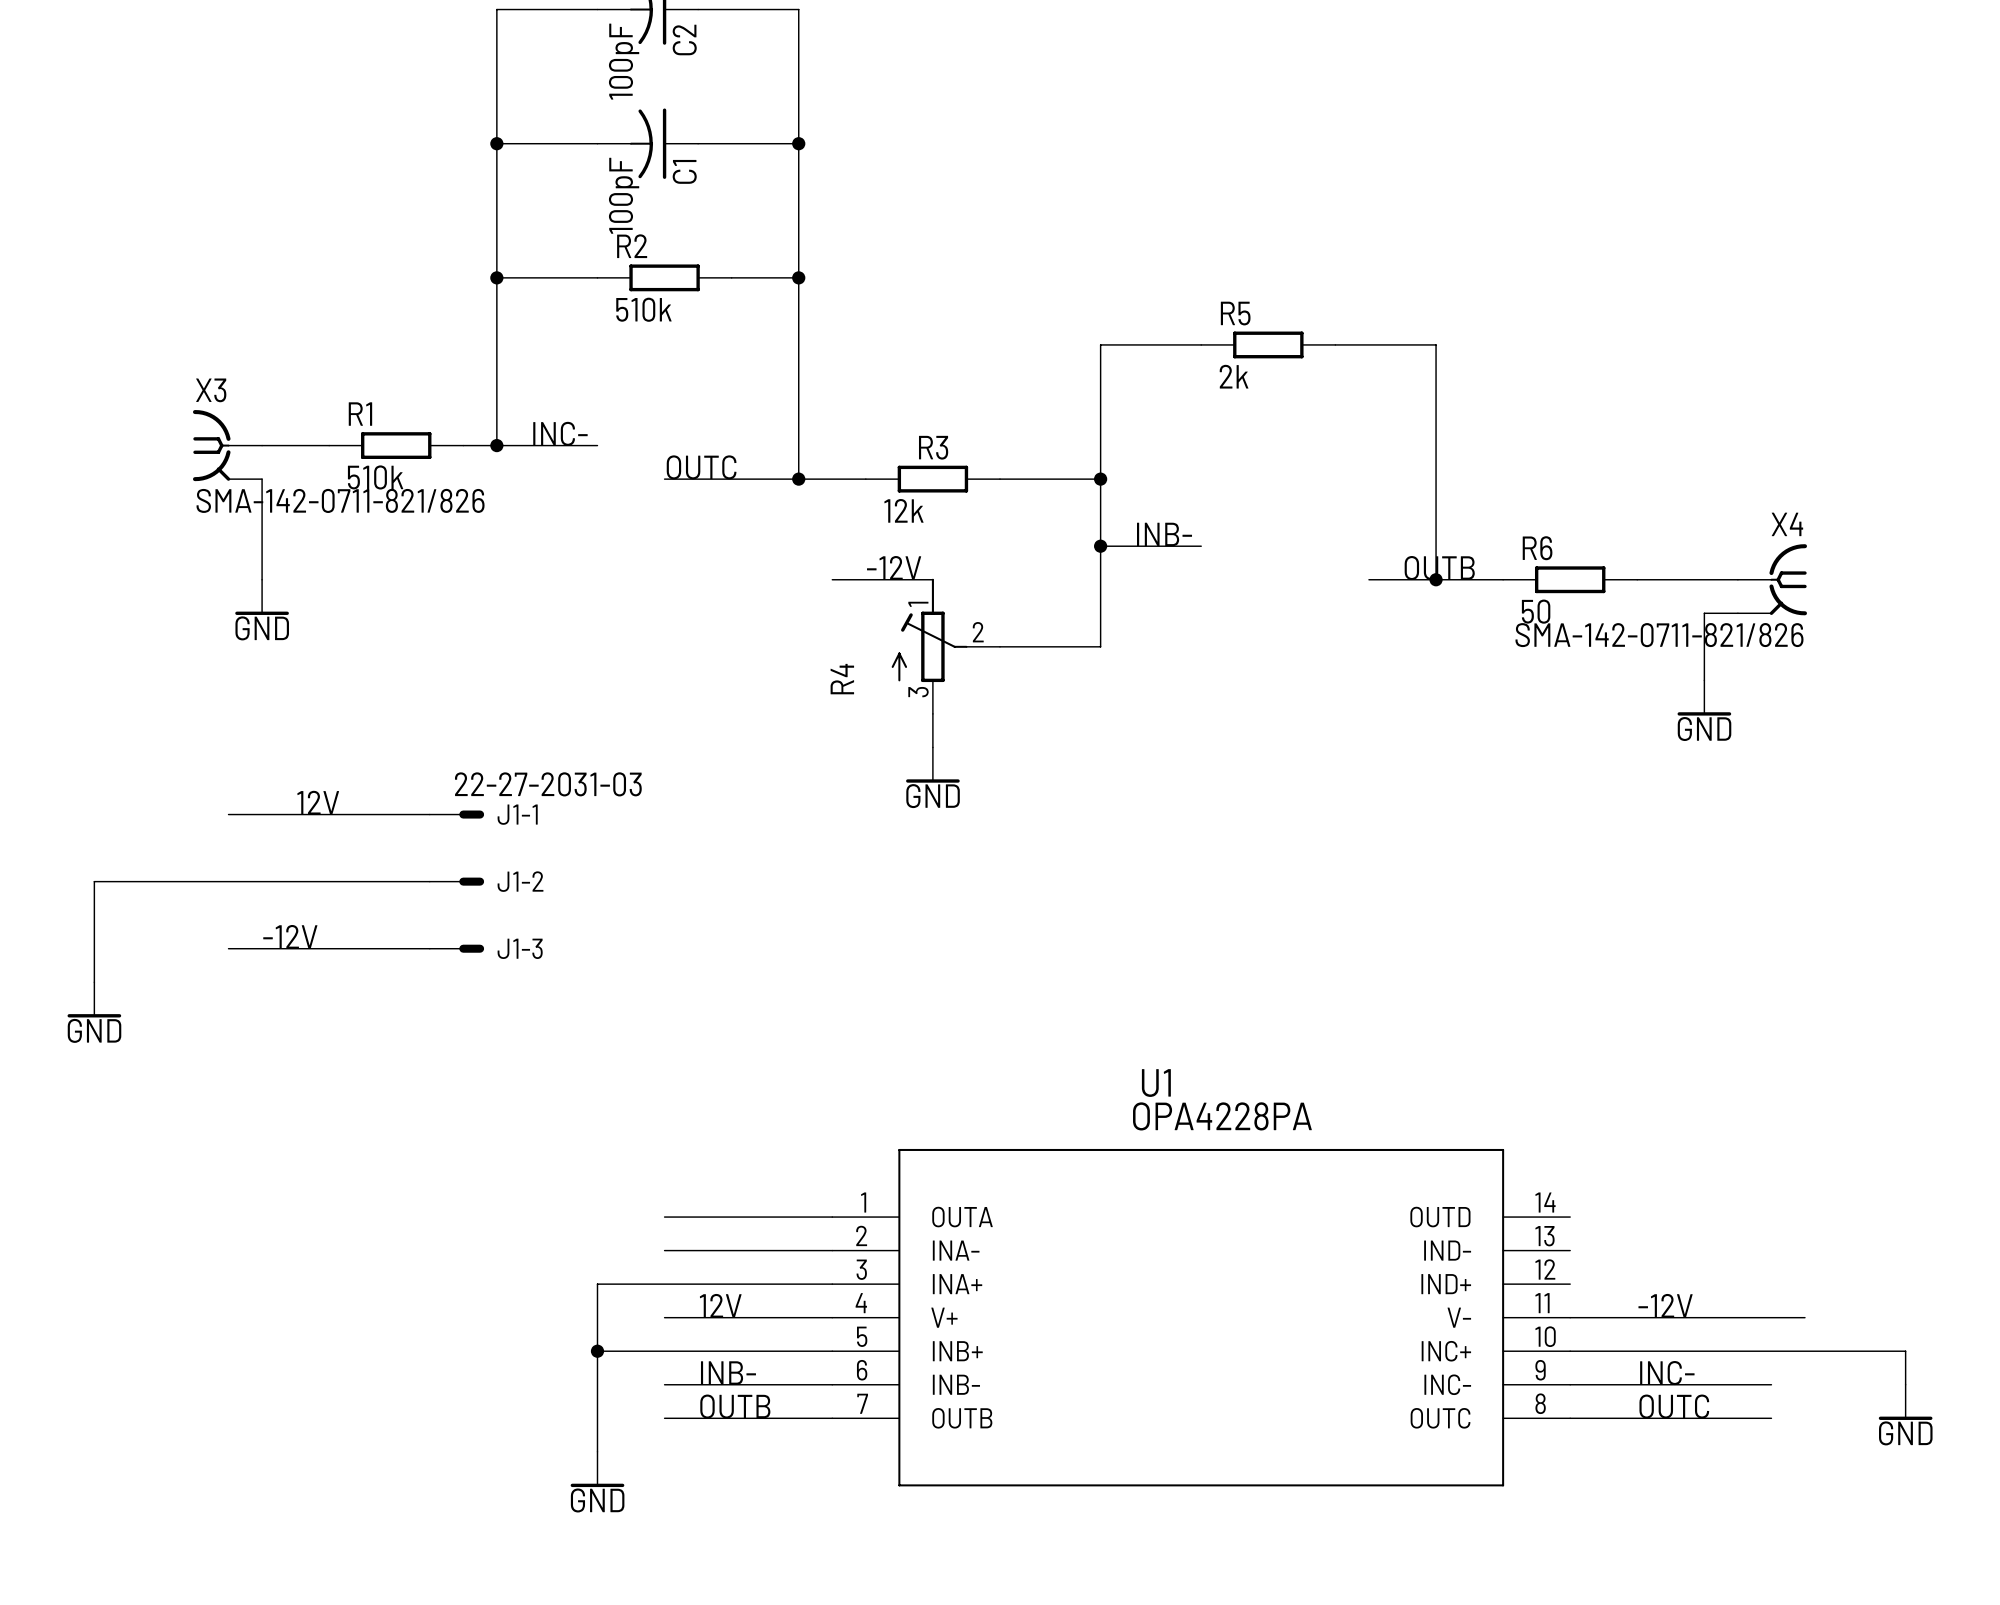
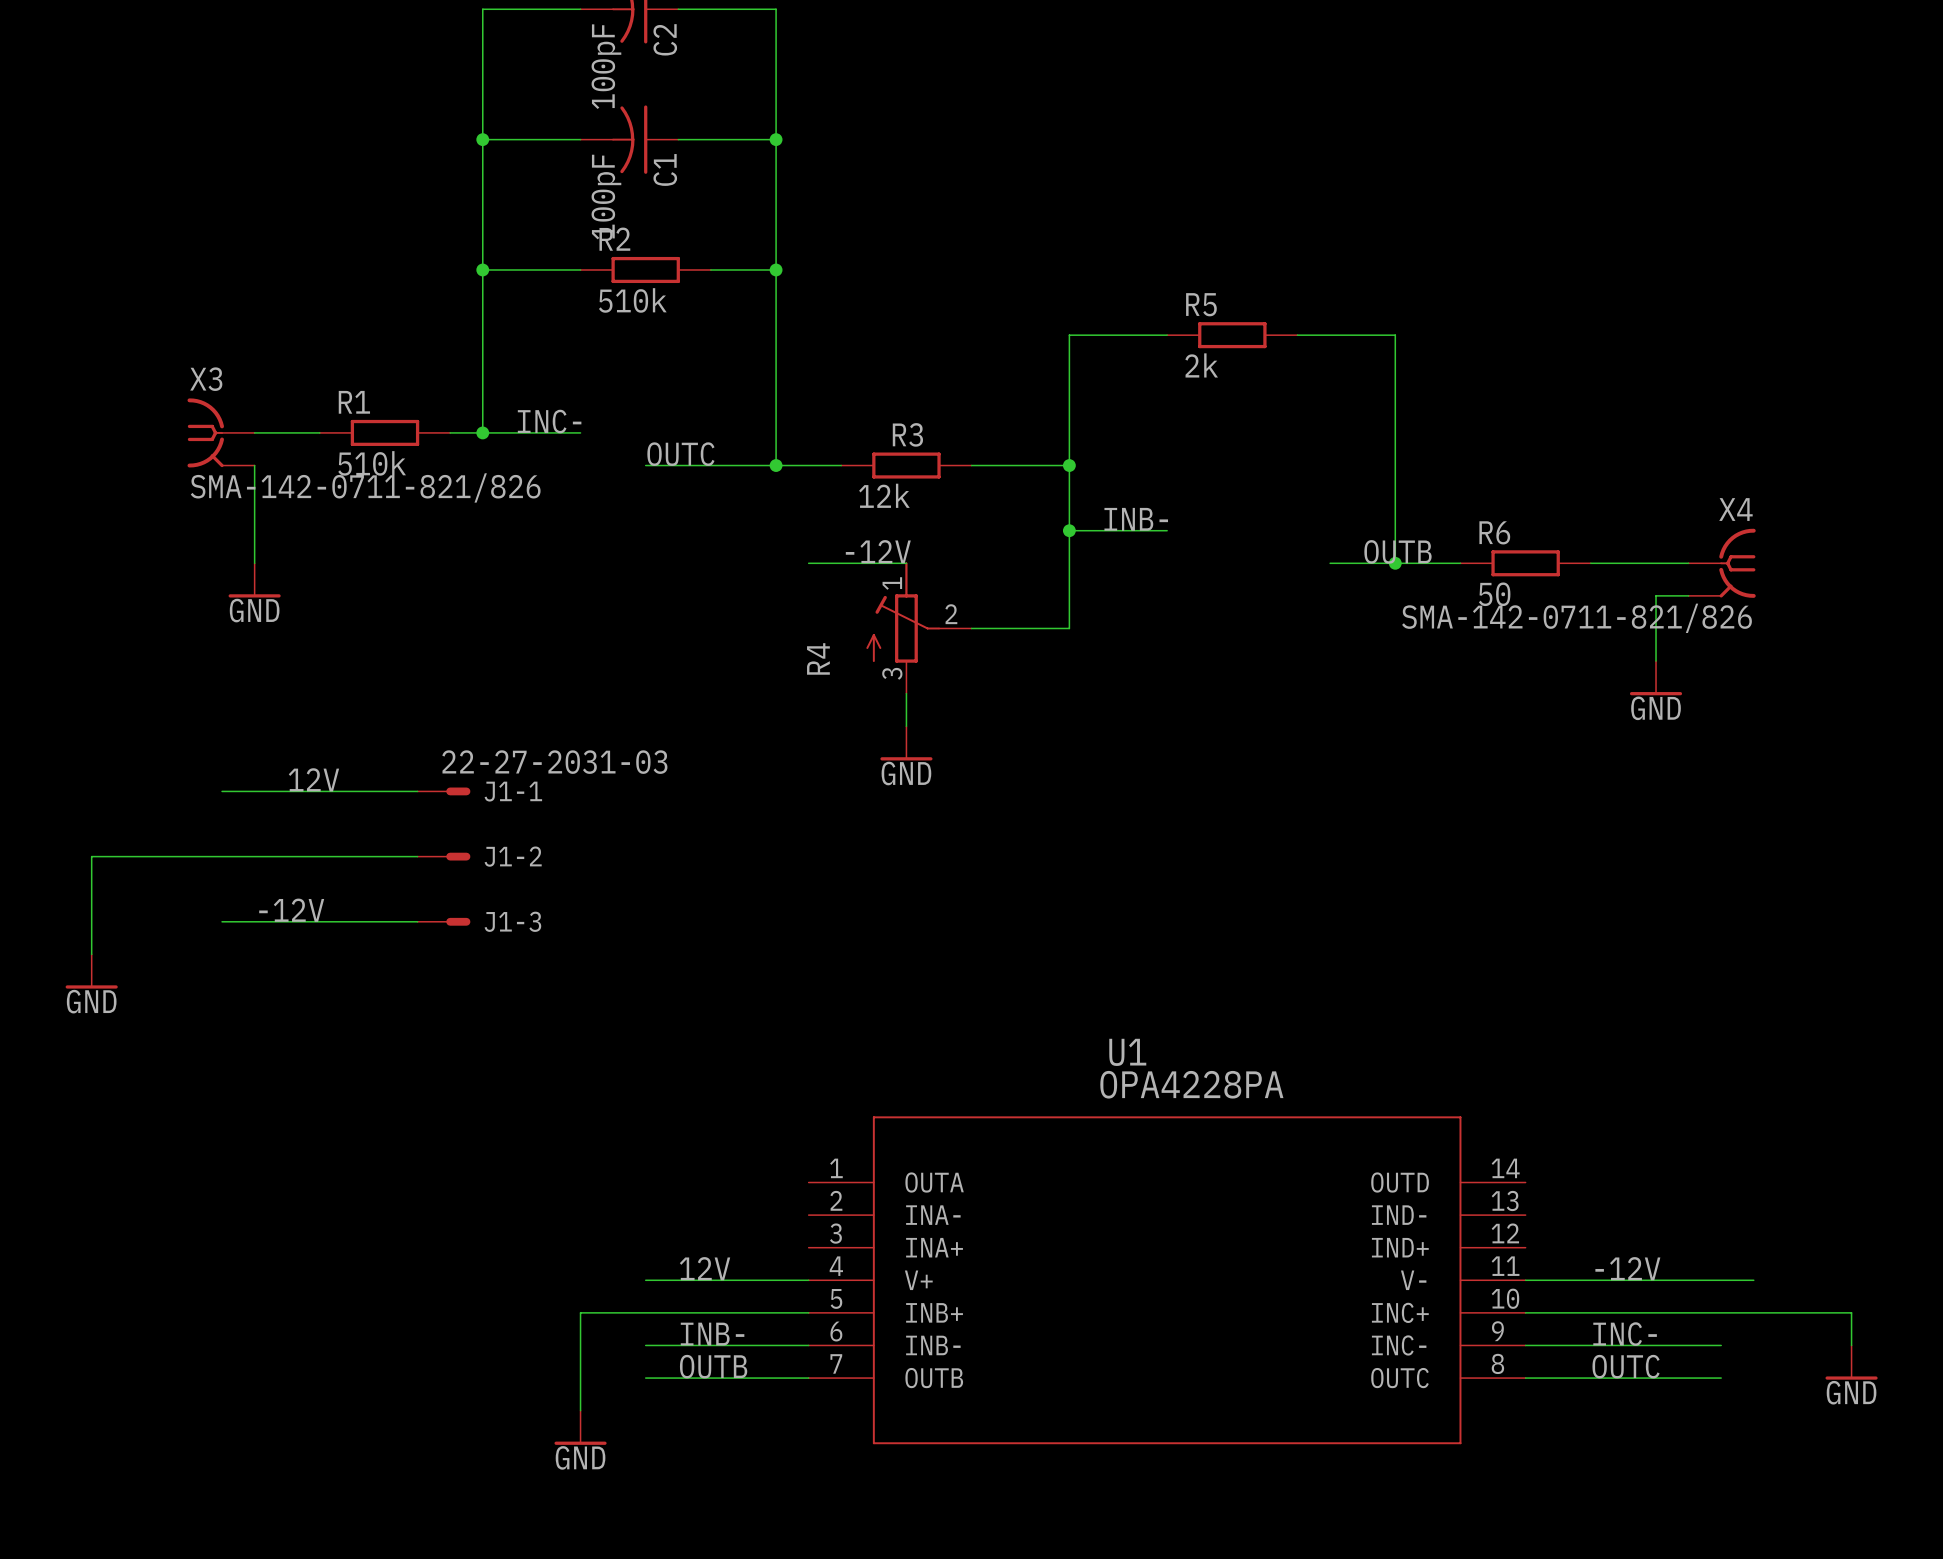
wire: (664, 1217) (832, 1217) -> none
wire: (664, 1250) (832, 1250) -> none
wire: (832, 1284) (597, 1284) (597, 1351) -> none
junction: (597, 1351) -> none

